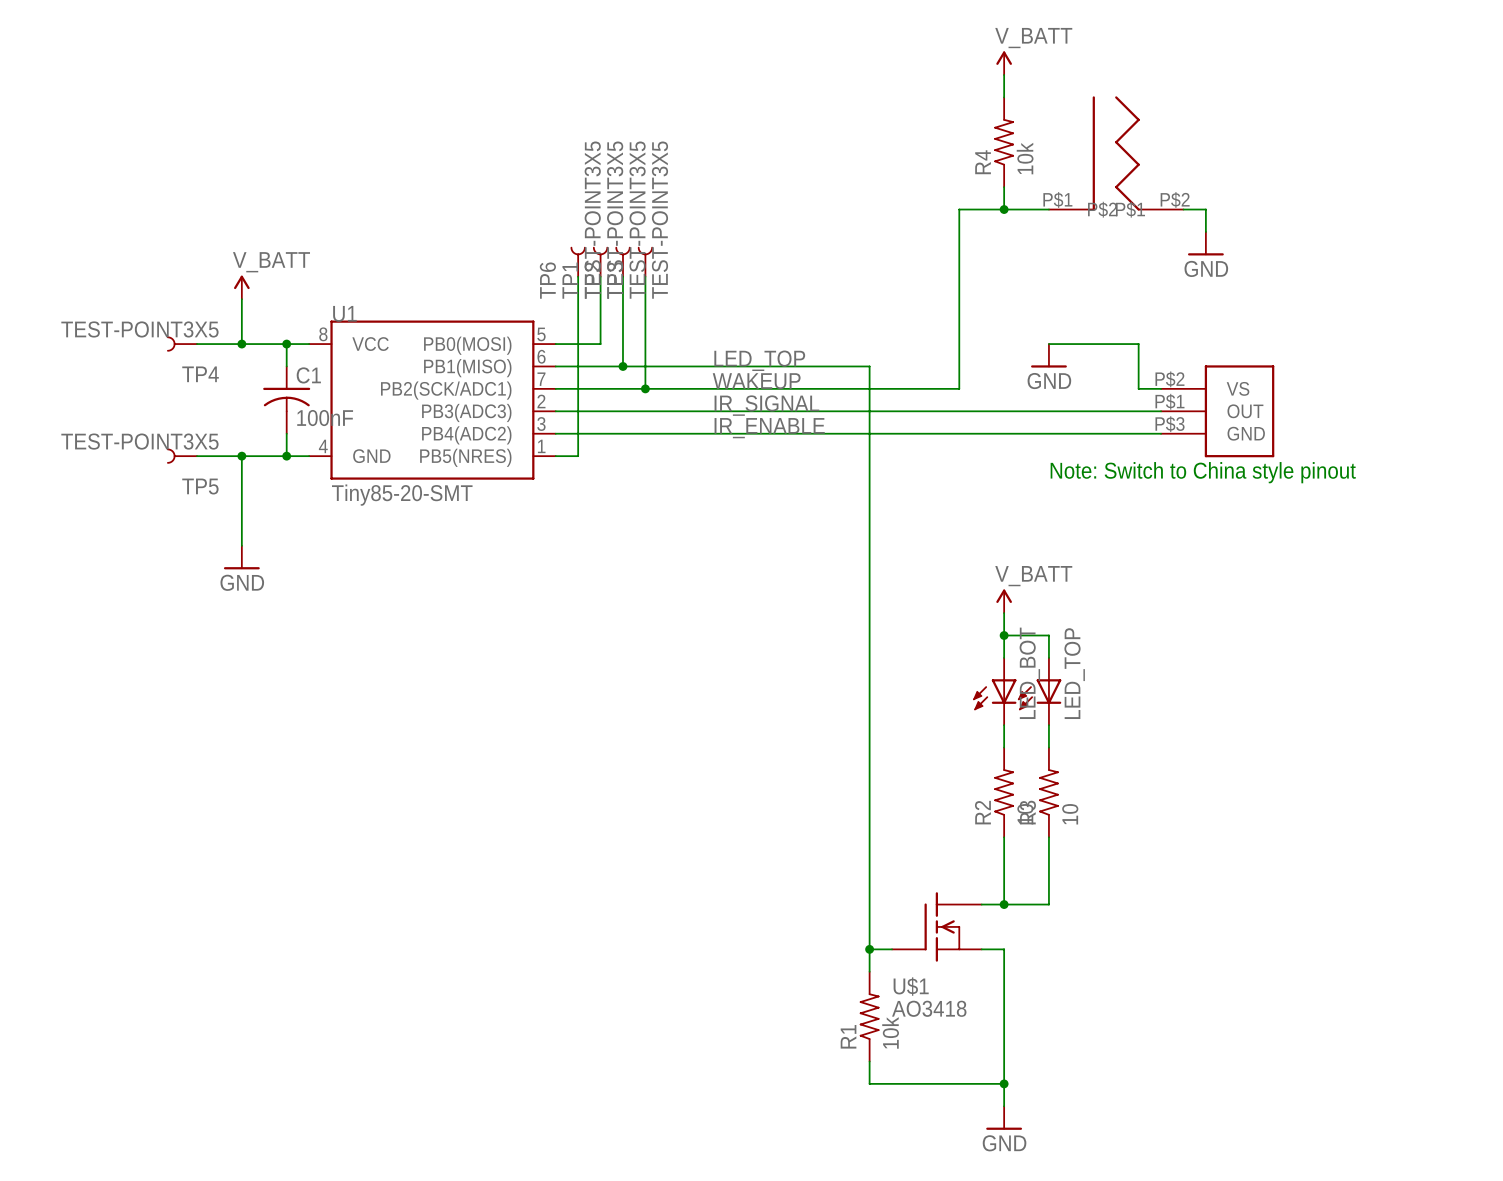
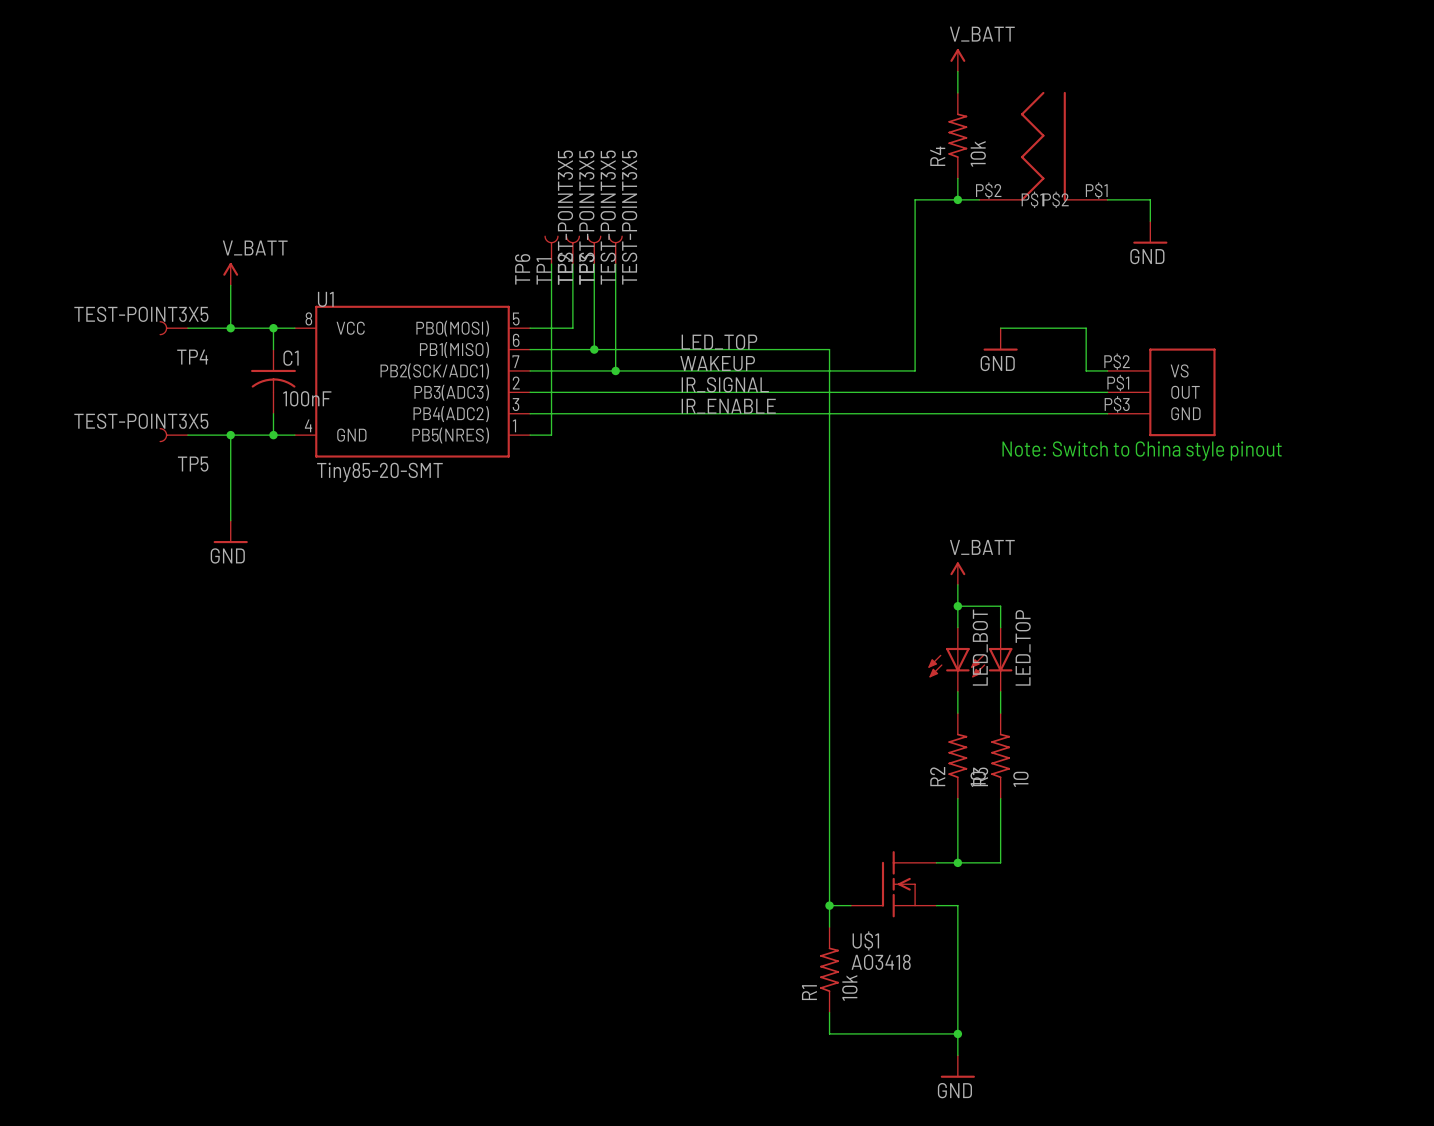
part: none -> (1043, 146)
part: (1116, 153) -> none

